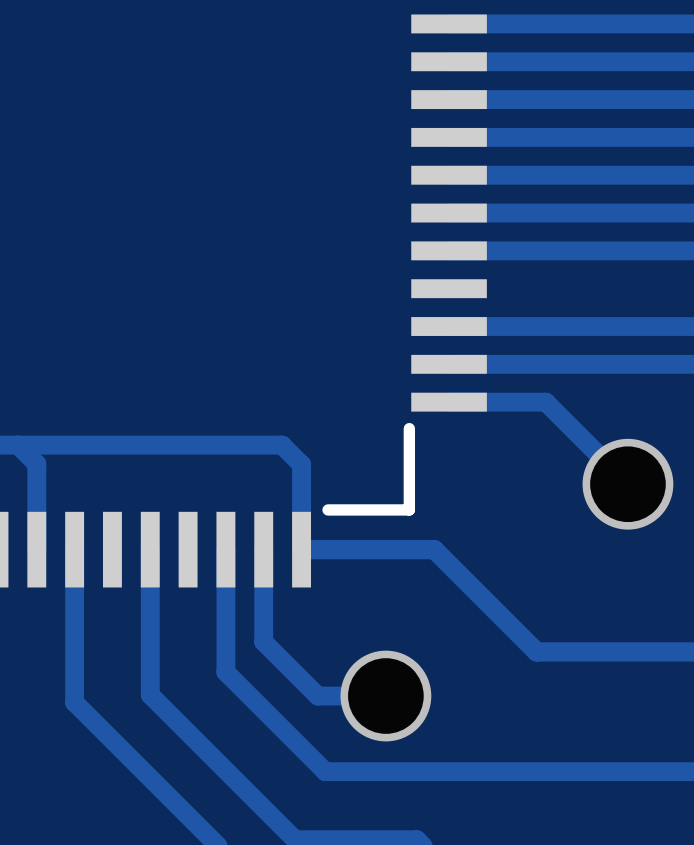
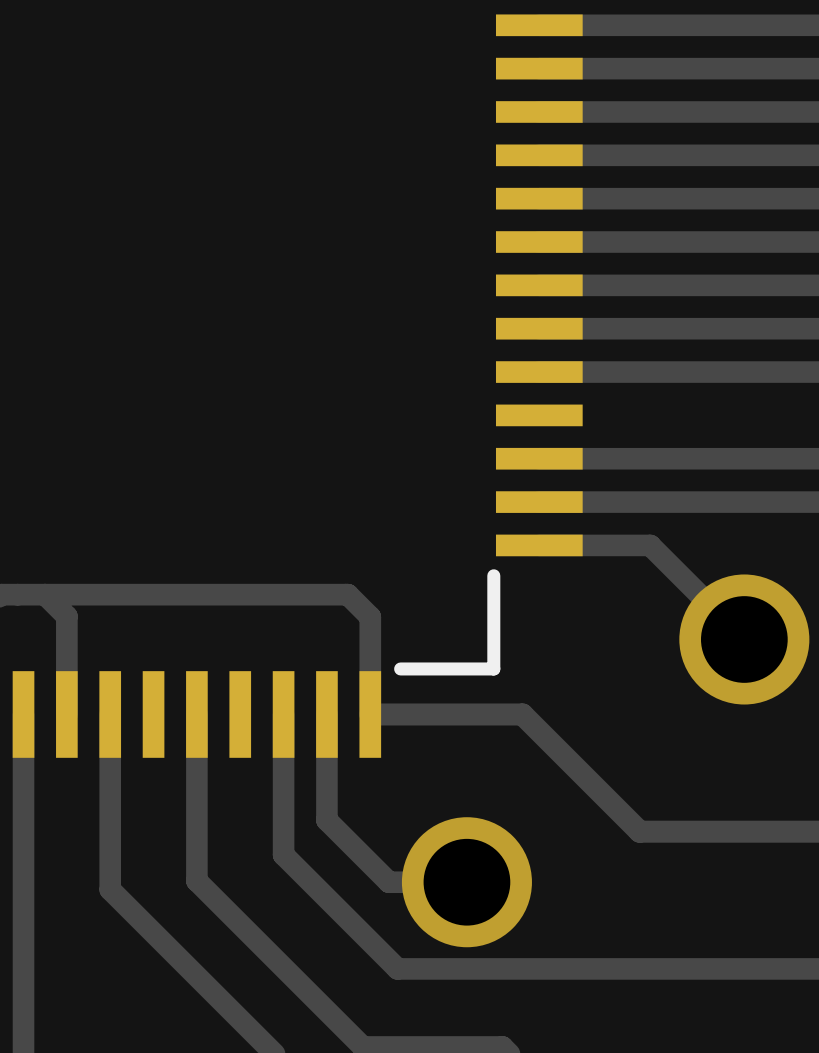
via size: [582, 438, 674, 530] -> [679, 574, 810, 705]
via size: [340, 650, 432, 742] -> [401, 817, 532, 948]

